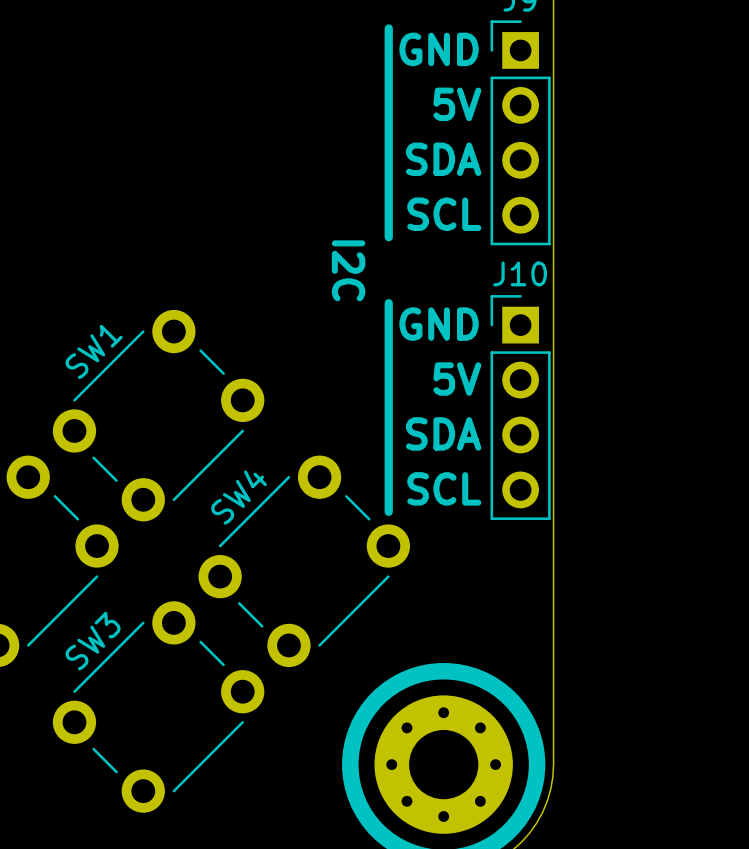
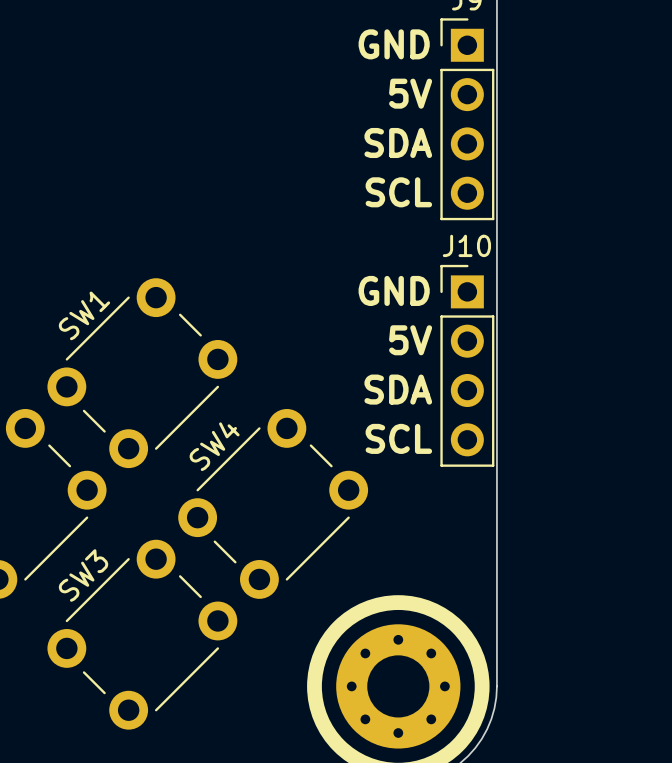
line: (388, 28) (388, 237) -> none
text: I2C (348, 270) -> none
line: (388, 303) (388, 511) -> none

